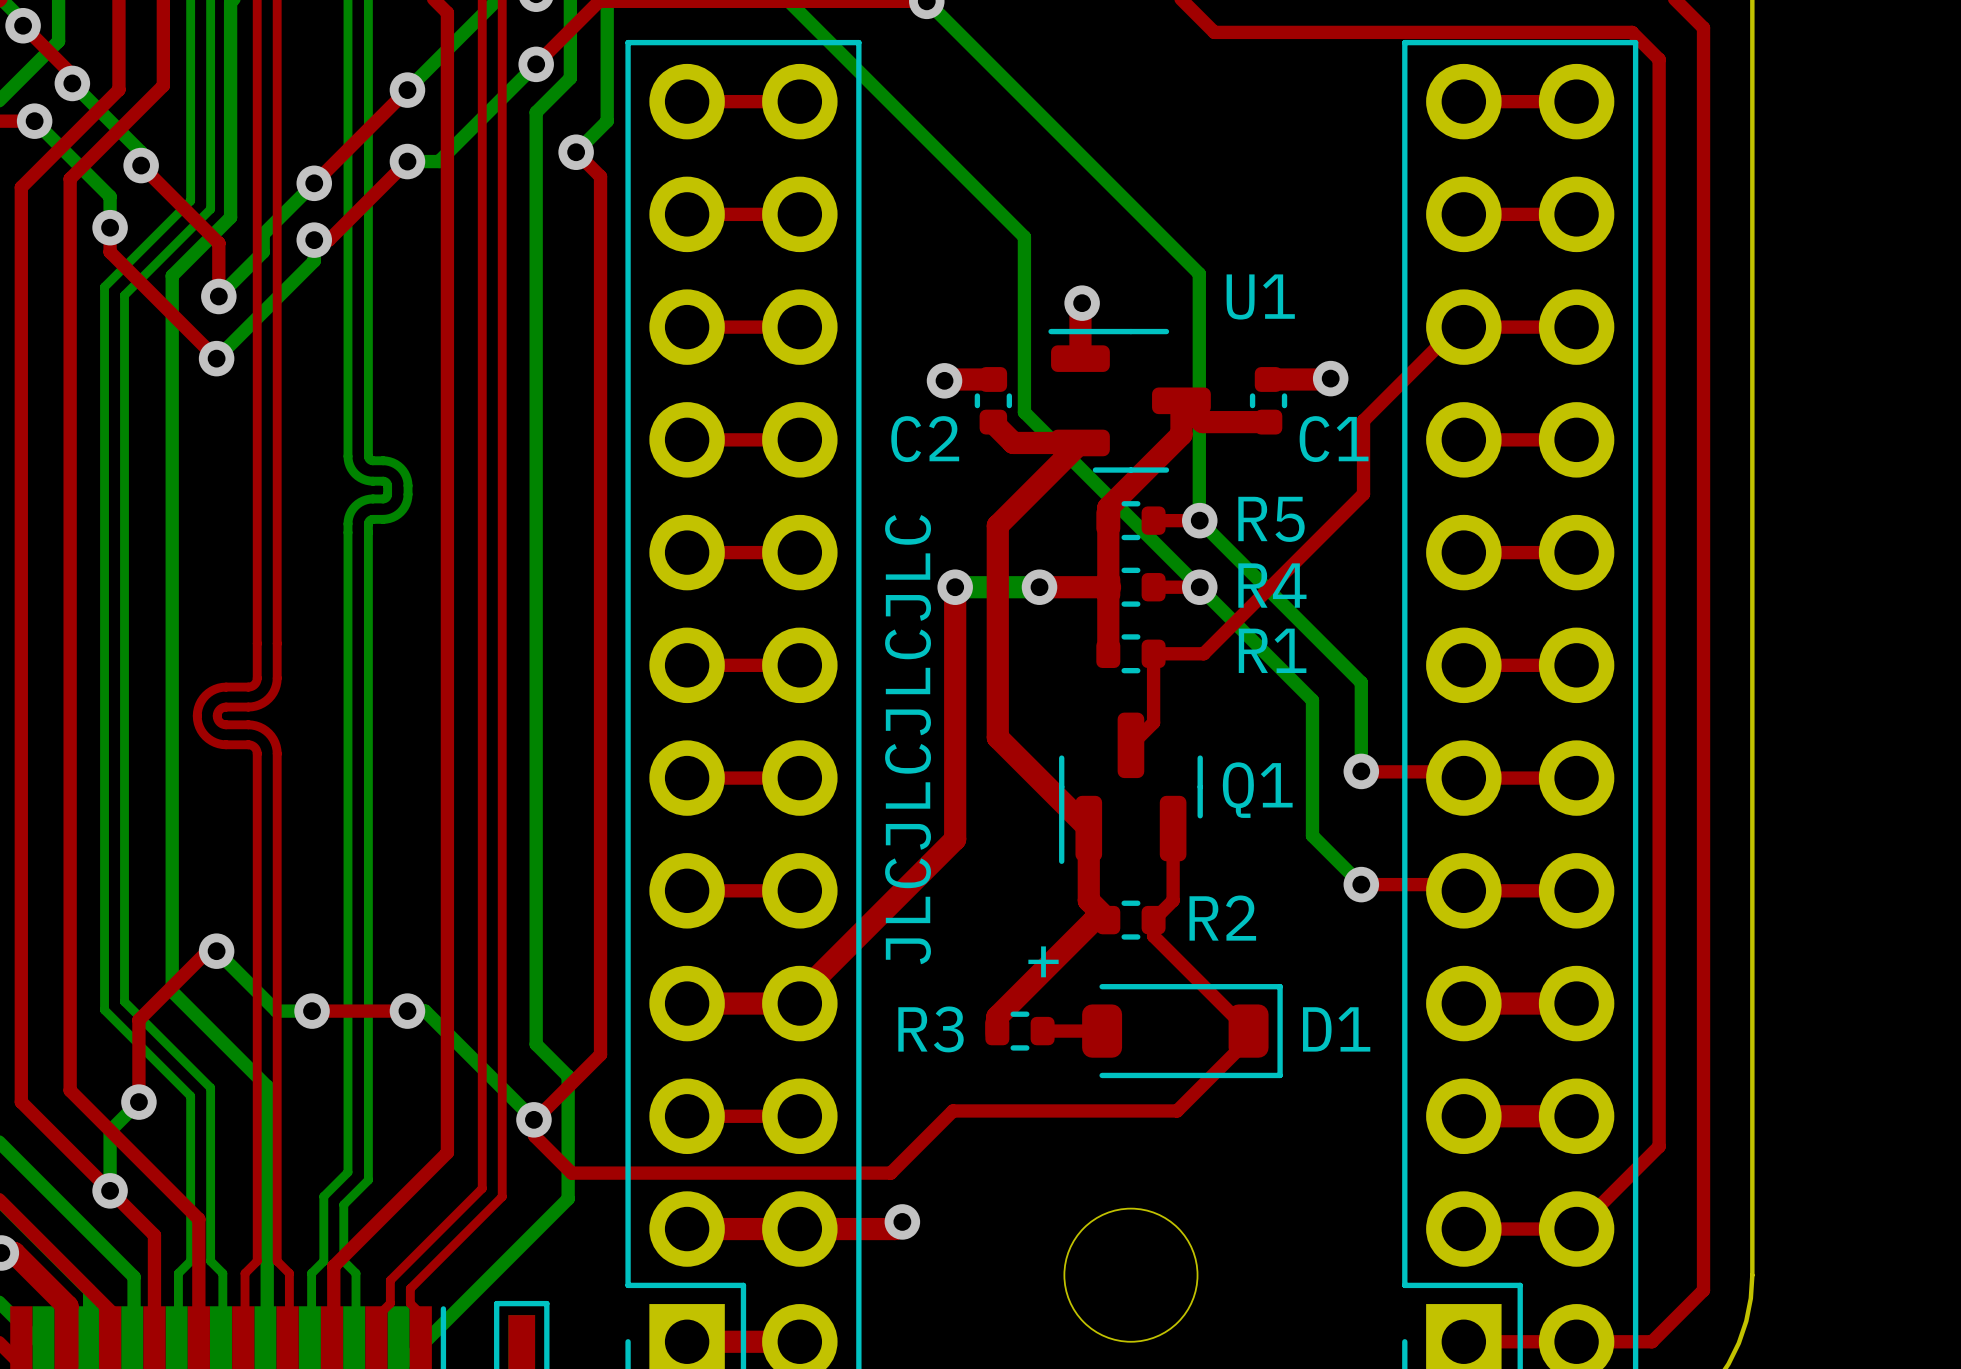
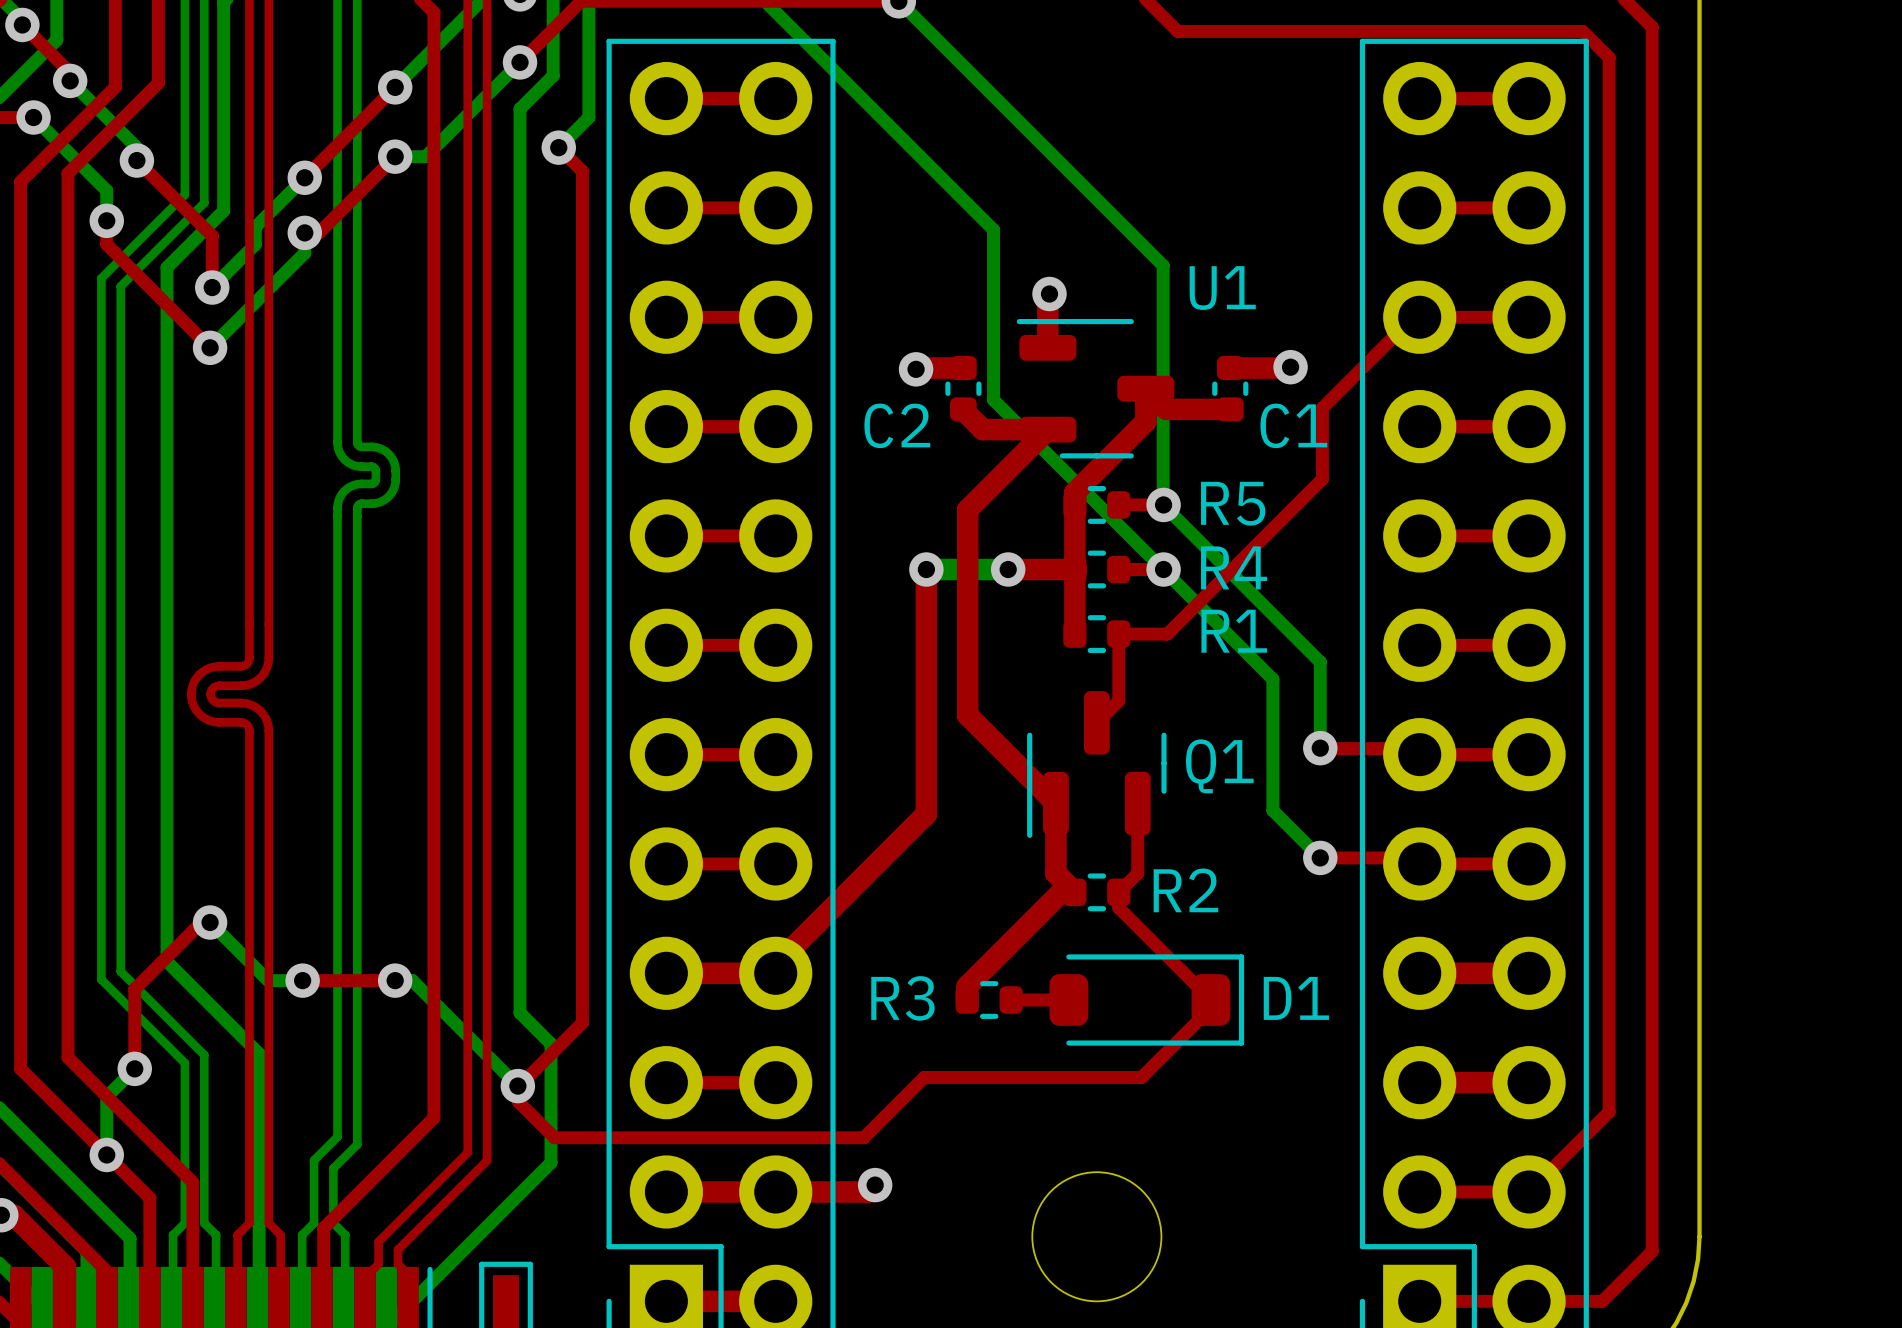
text: JLCJLCJLCJLC (908, 739) -> none
text: + (1043, 961) -> none

